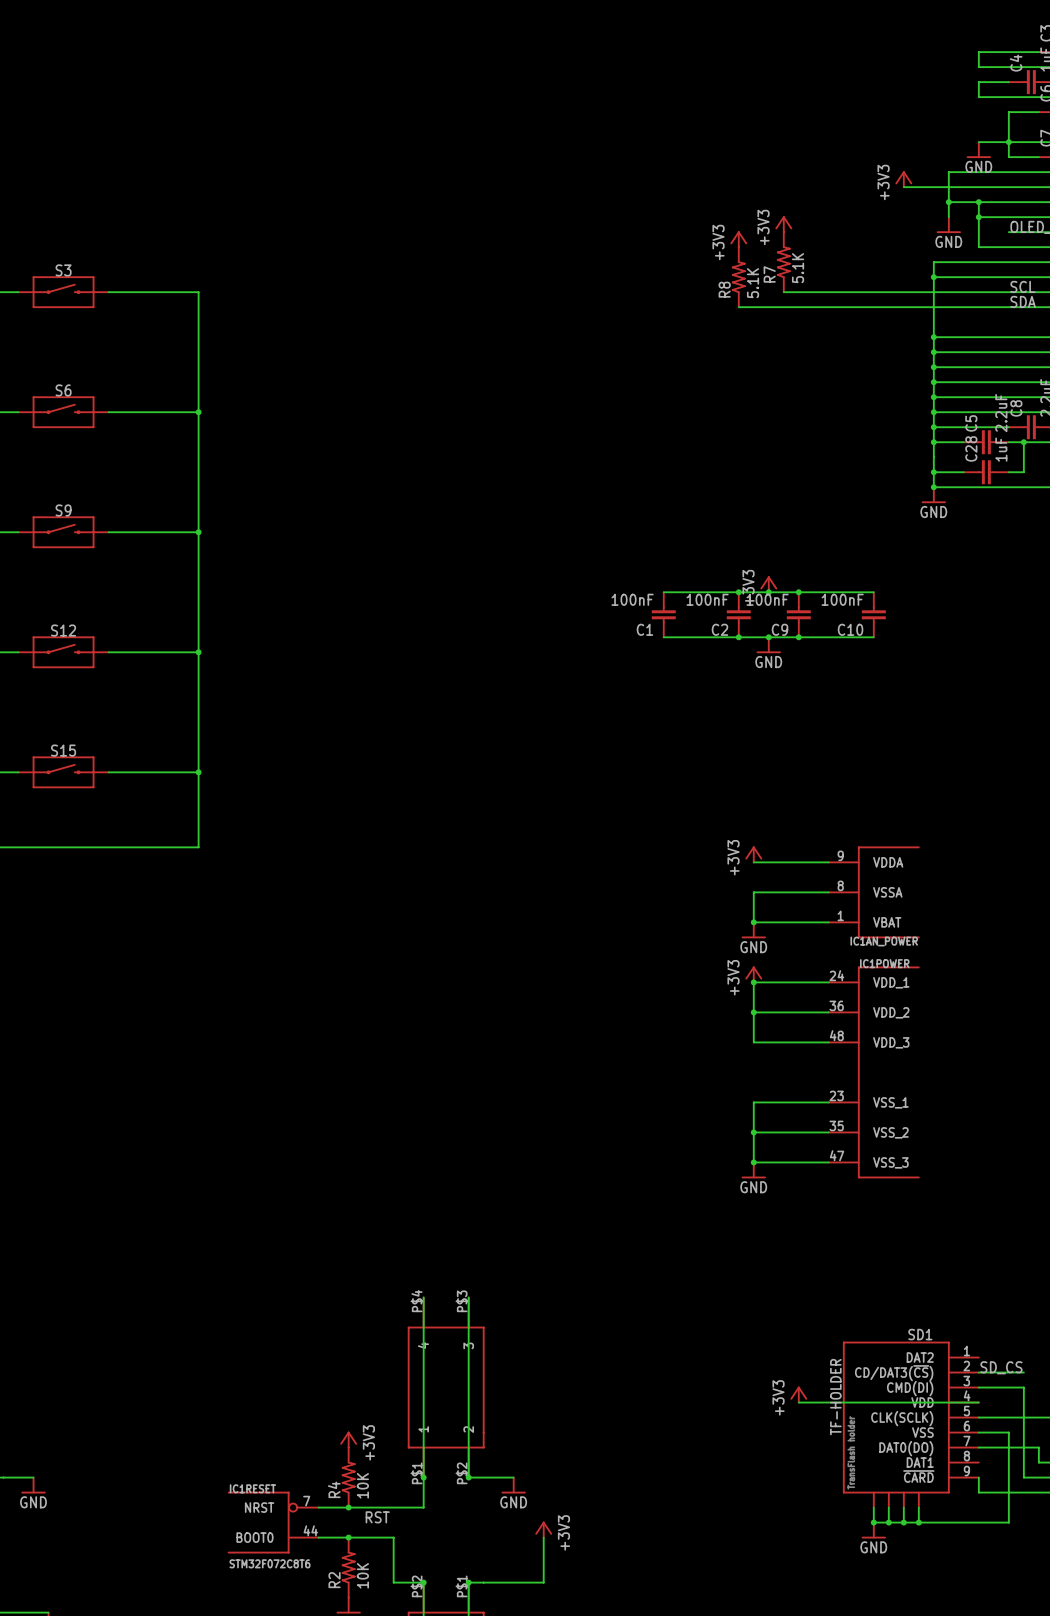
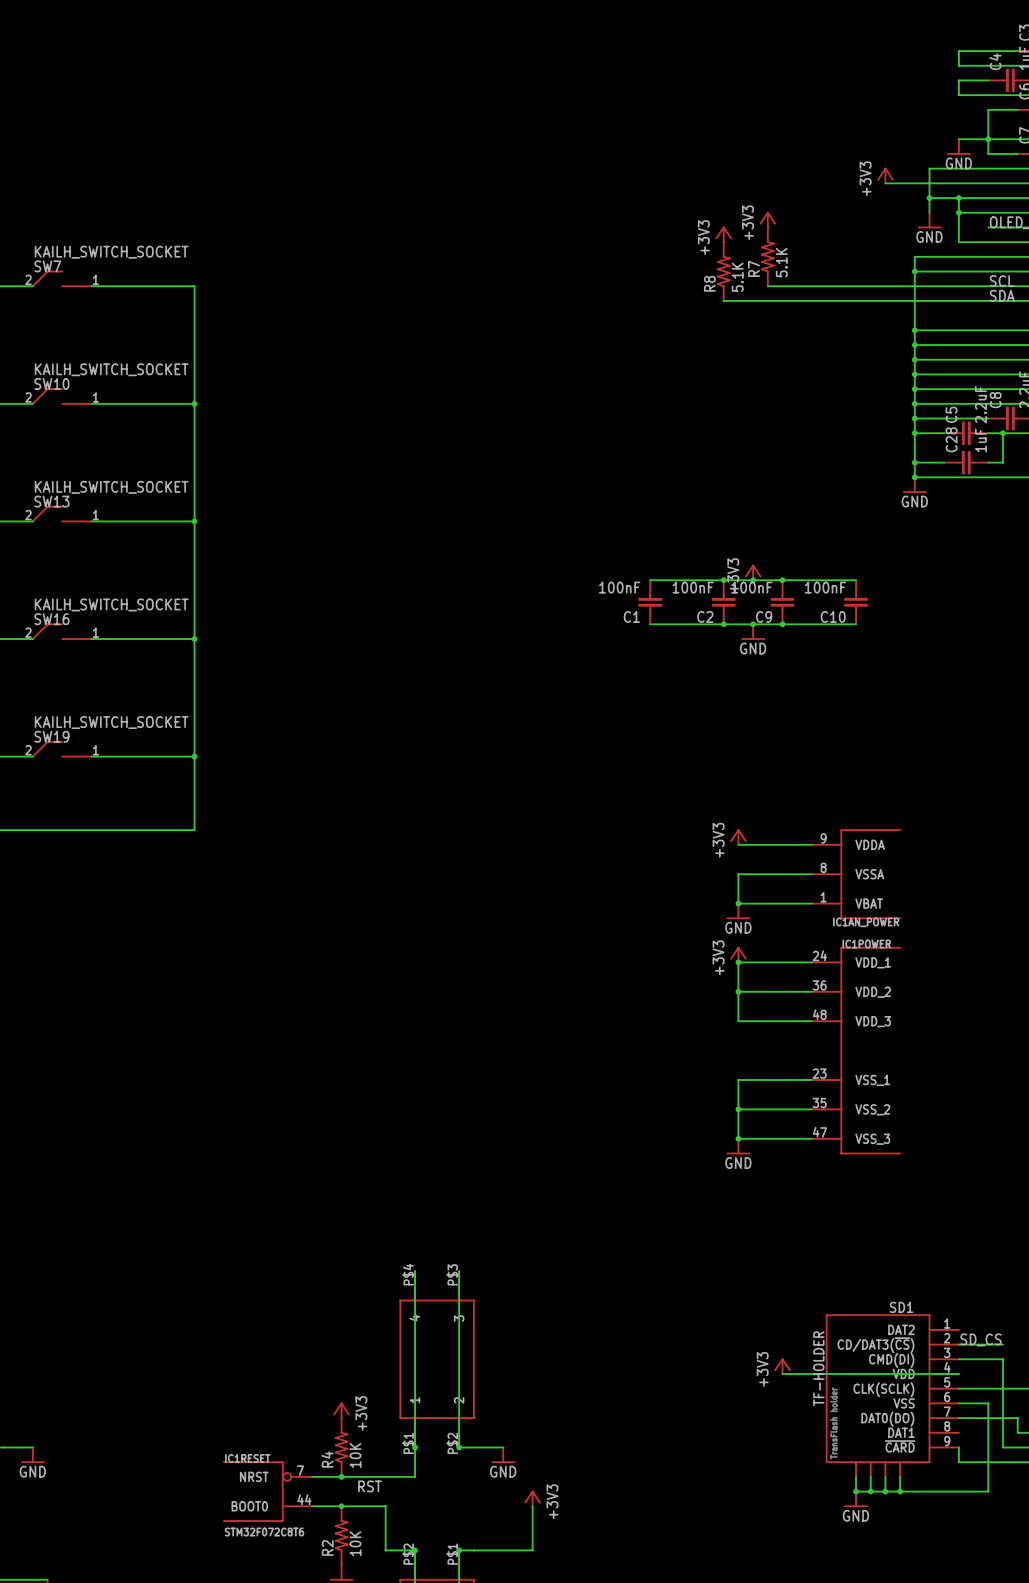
SW7: none -> KAILH_SWITCH_SOCKET (62, 278)
S3: (63, 292) -> none
SW10: none -> KAILH_SWITCH_SOCKET (62, 396)
S6: (63, 412) -> none
SW13: none -> KAILH_SWITCH_SOCKET (62, 514)
S9: (63, 532) -> none
SW16: none -> KAILH_SWITCH_SOCKET (62, 631)
S12: (63, 652) -> none
SW19: none -> KAILH_SWITCH_SOCKET (62, 749)
S15: (63, 772) -> none

